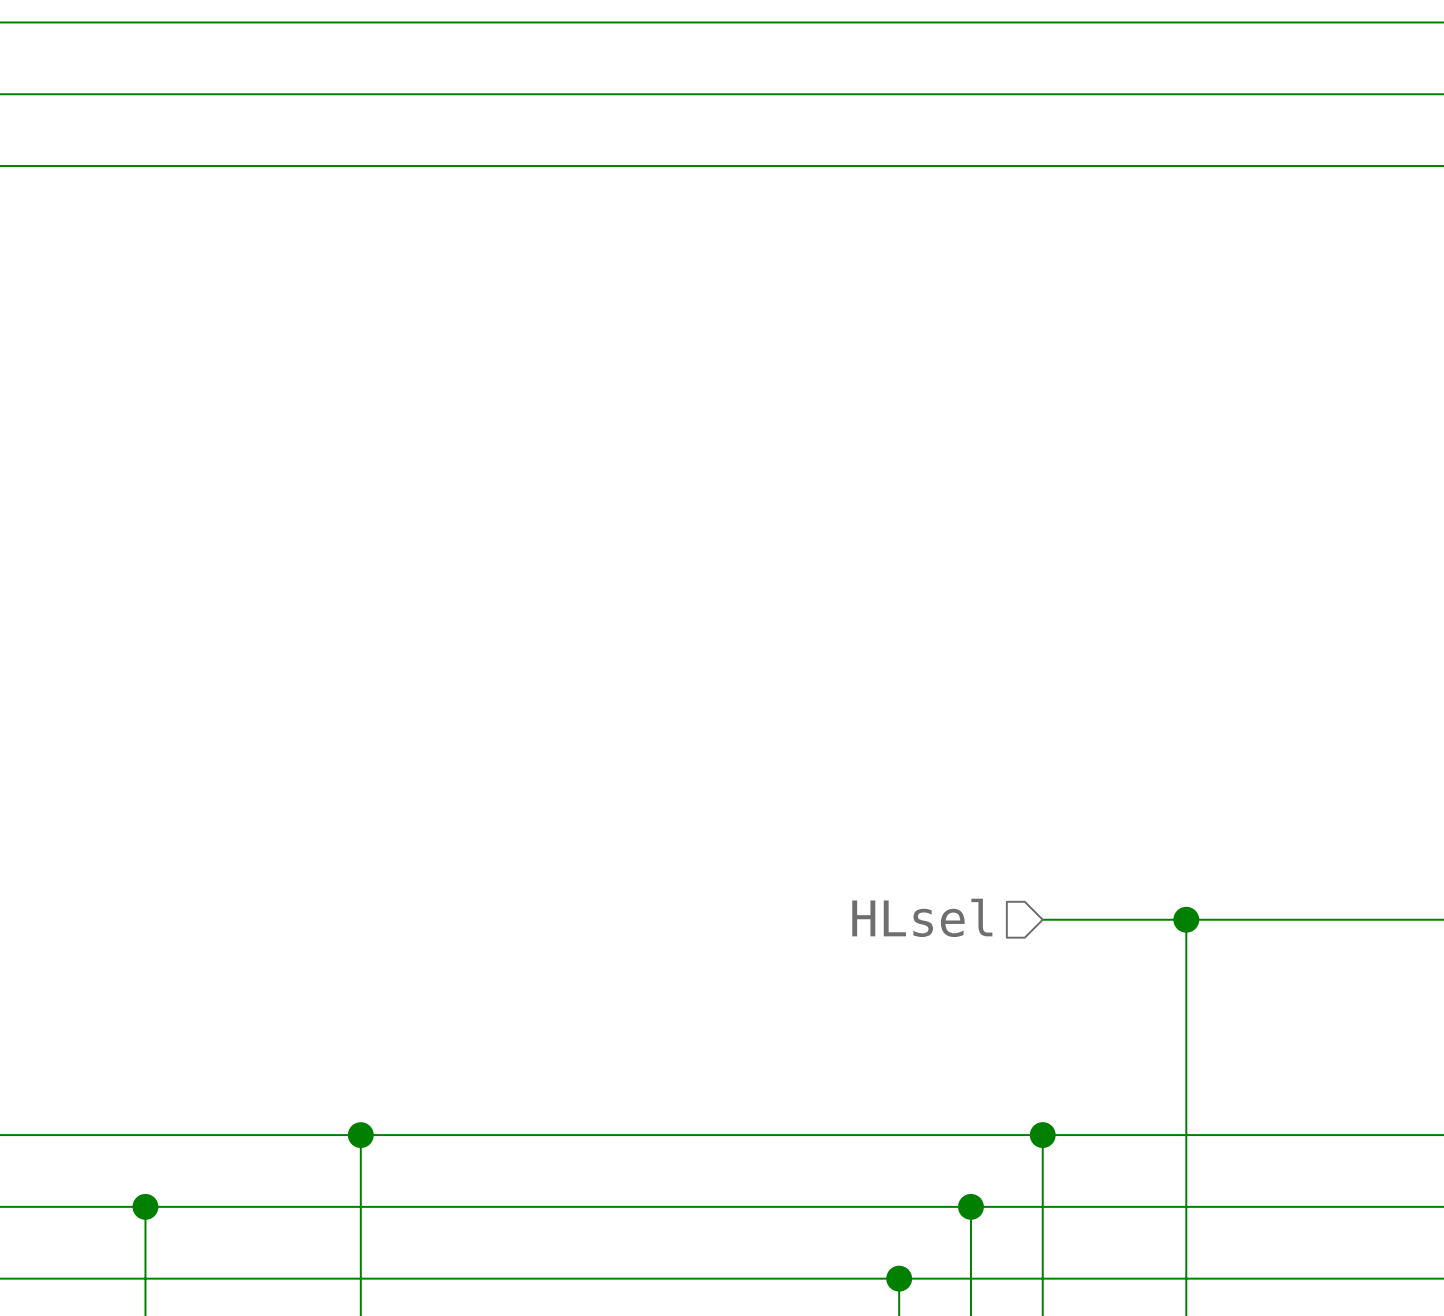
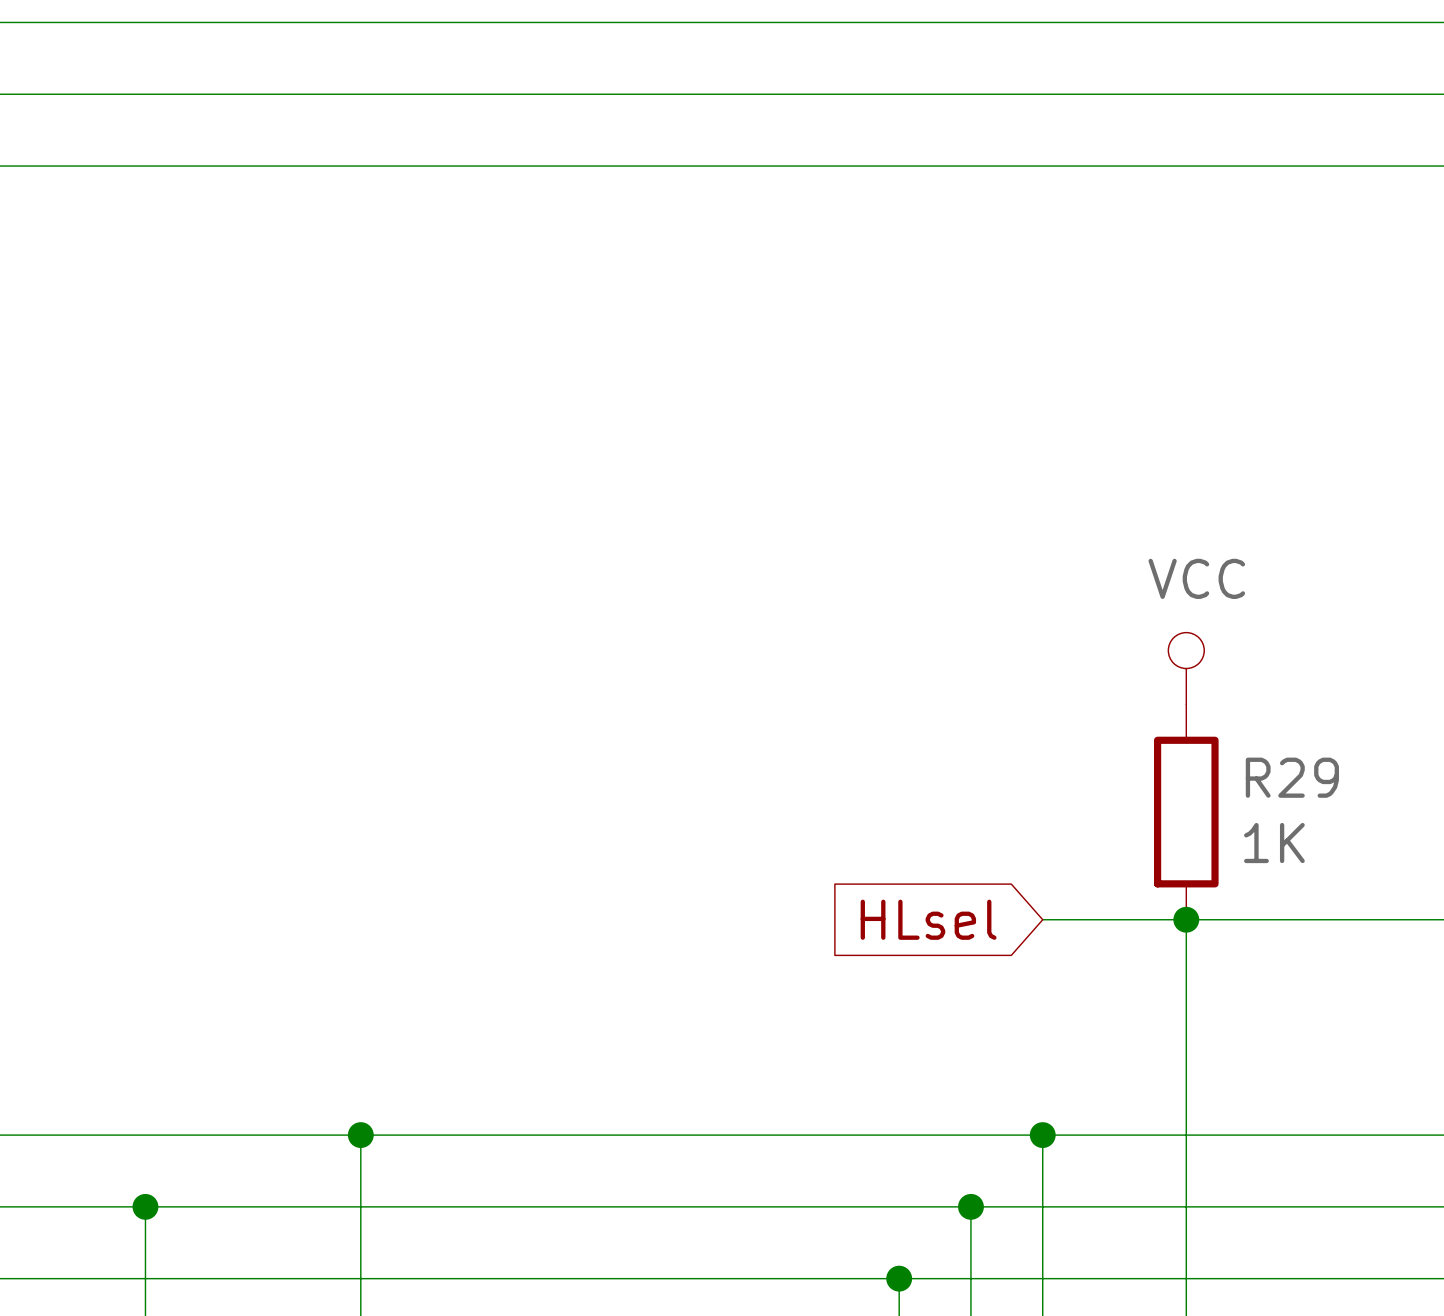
power symbol: none -> VCC (1186, 668)
R29: none -> 1K (1186, 812)
hierarchical label: HLsel (922, 917) -> none
global label: none -> HLsel (928, 919)

